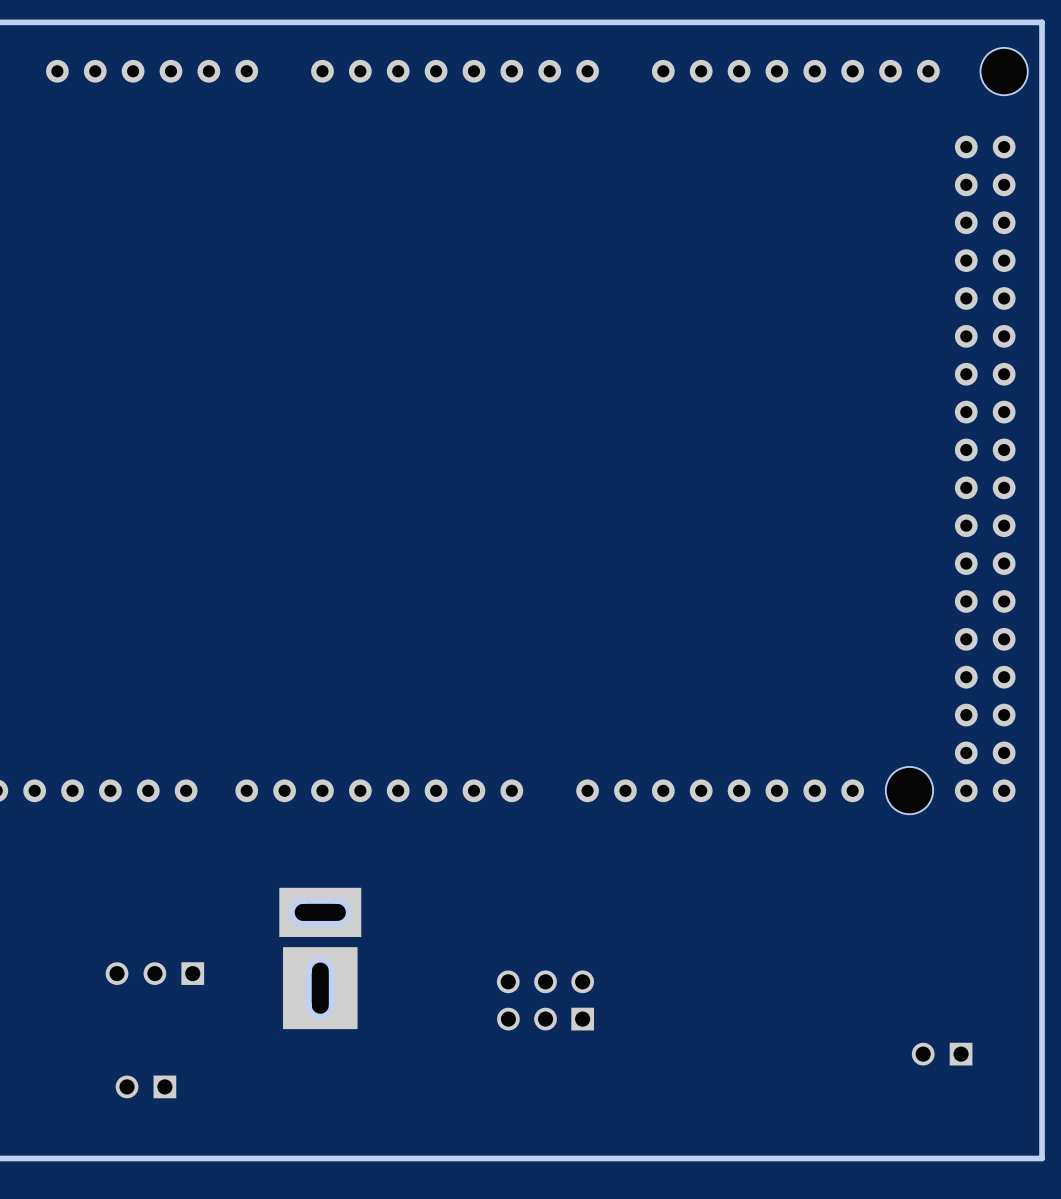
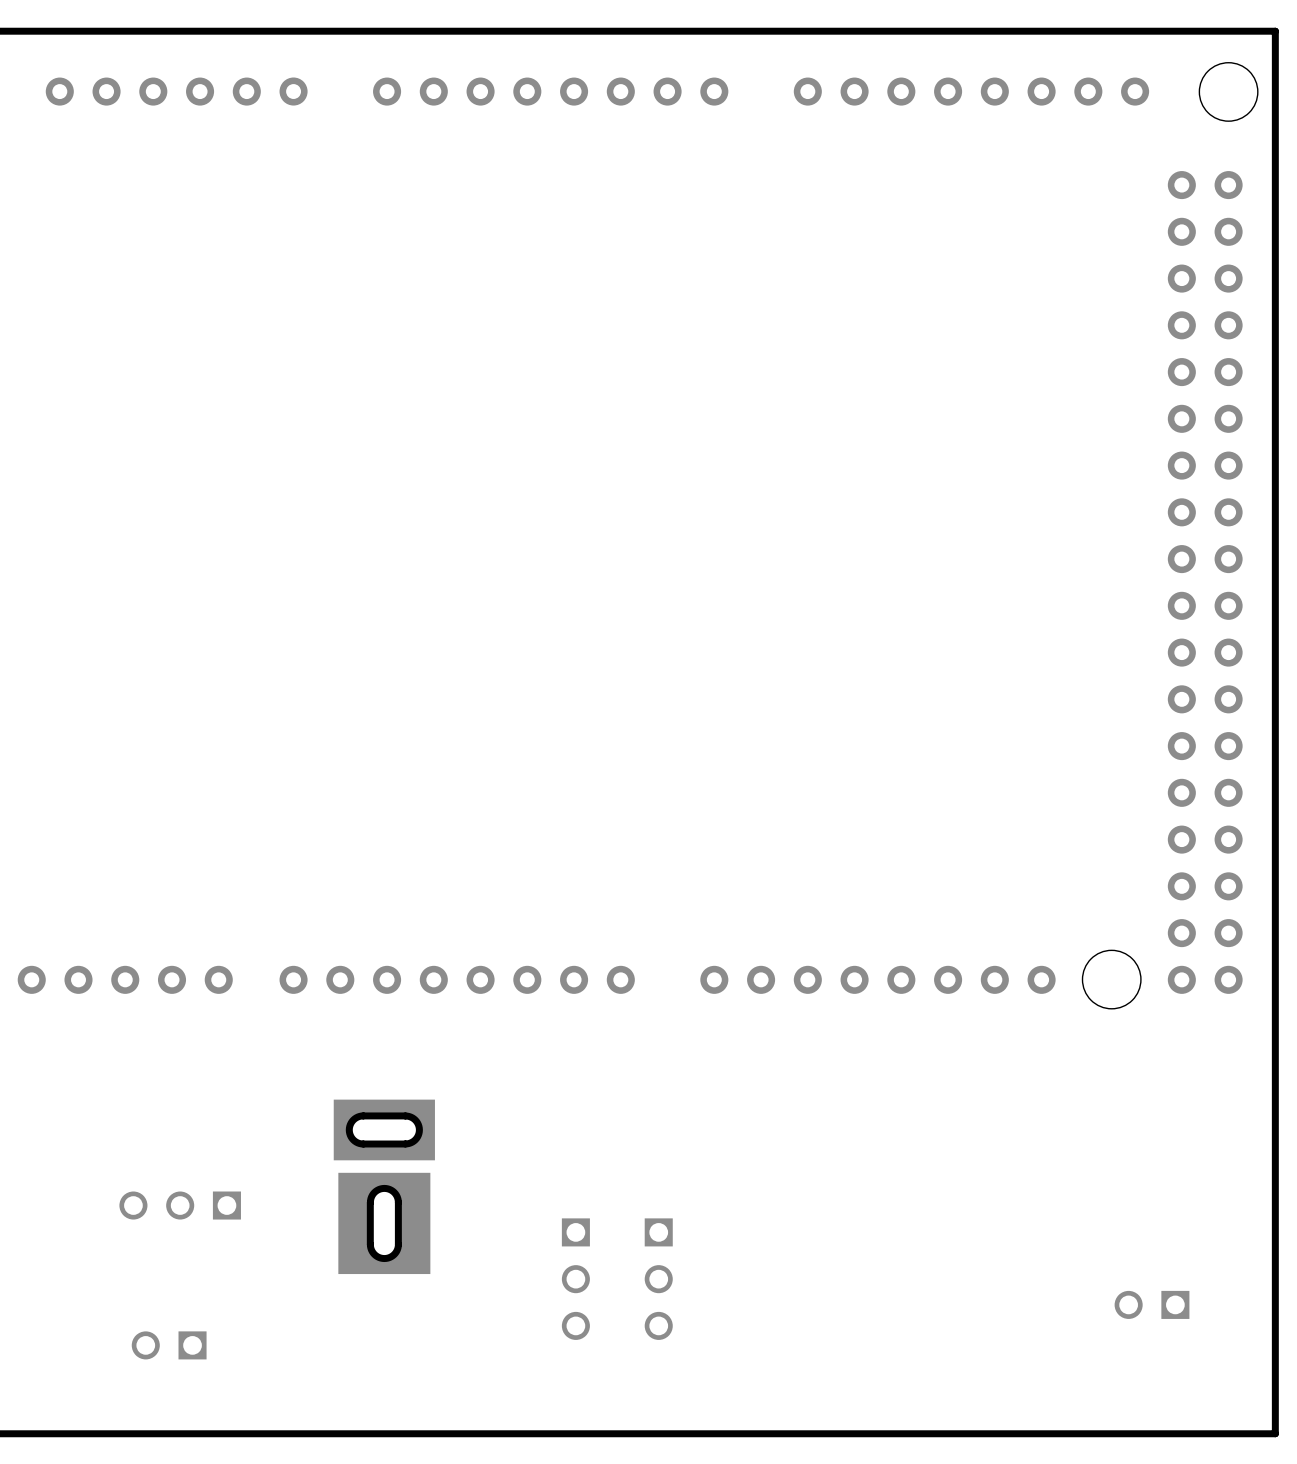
part: (545, 1000) -> none
part: none -> (575, 1279)
part: none -> (658, 1279)

